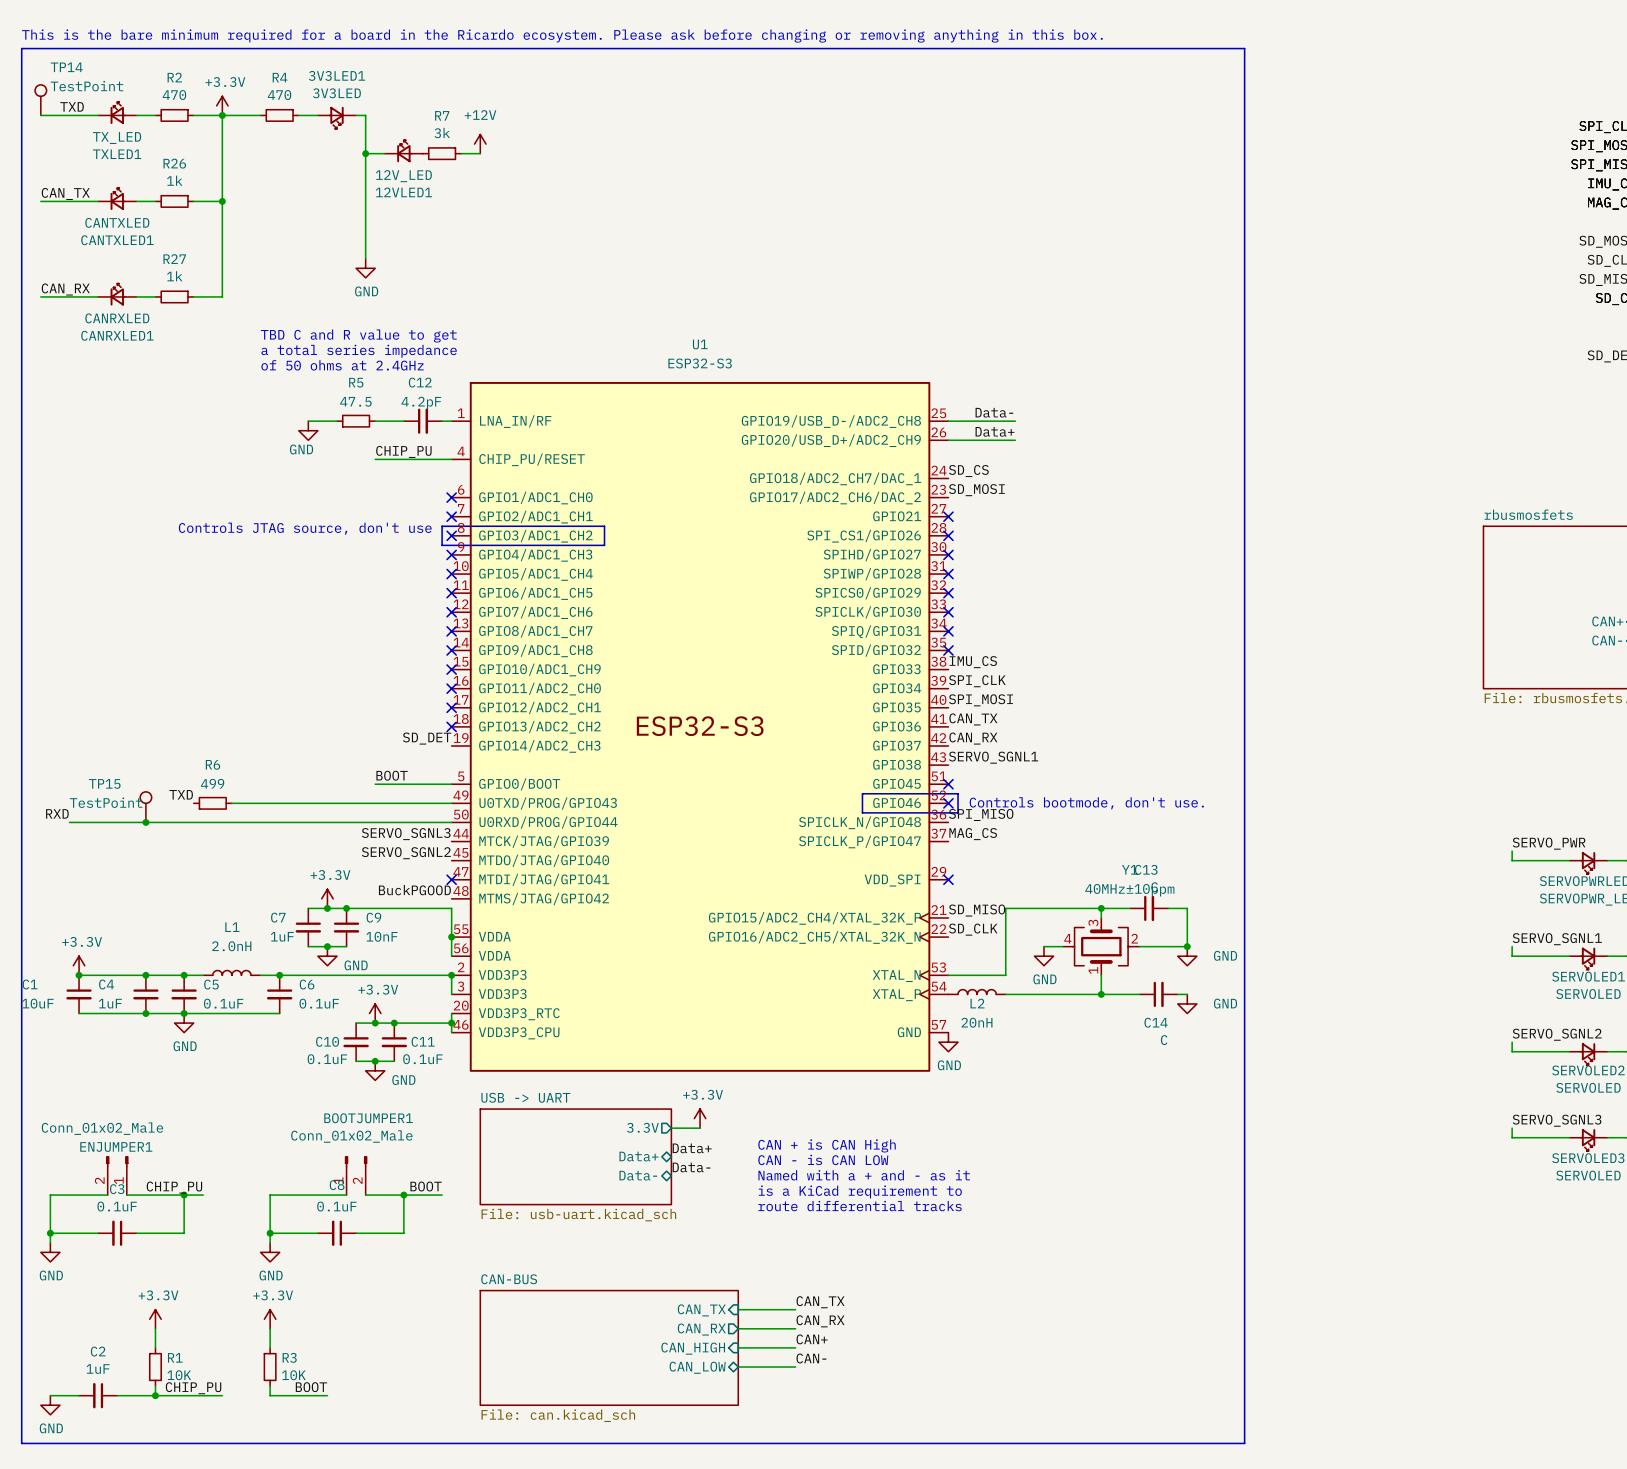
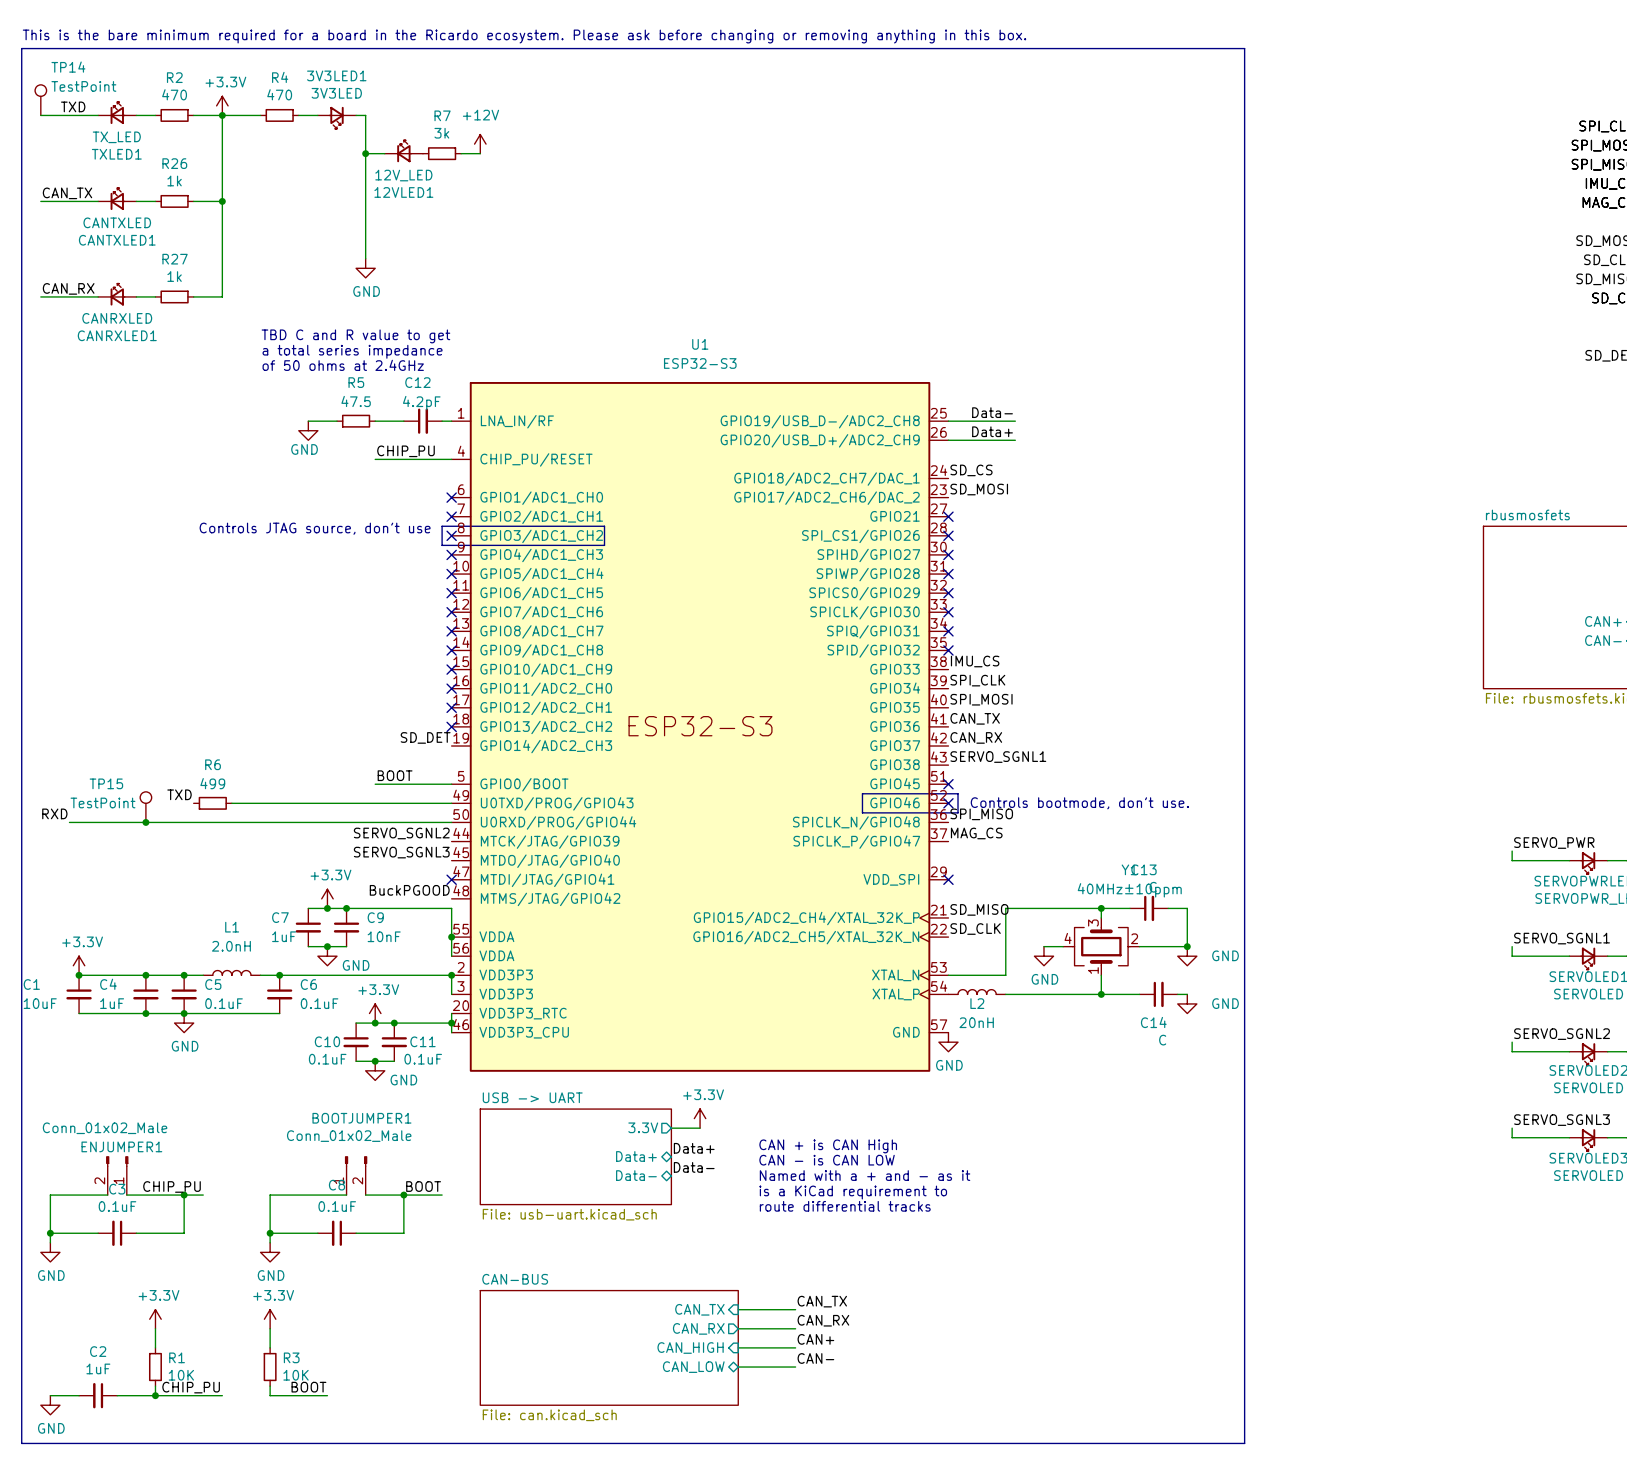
label: SERVO_SGNL3 (406, 834) -> SERVO_SGNL2 (401, 833)
label: SERVO_SGNL2 (406, 853) -> SERVO_SGNL3 (401, 852)

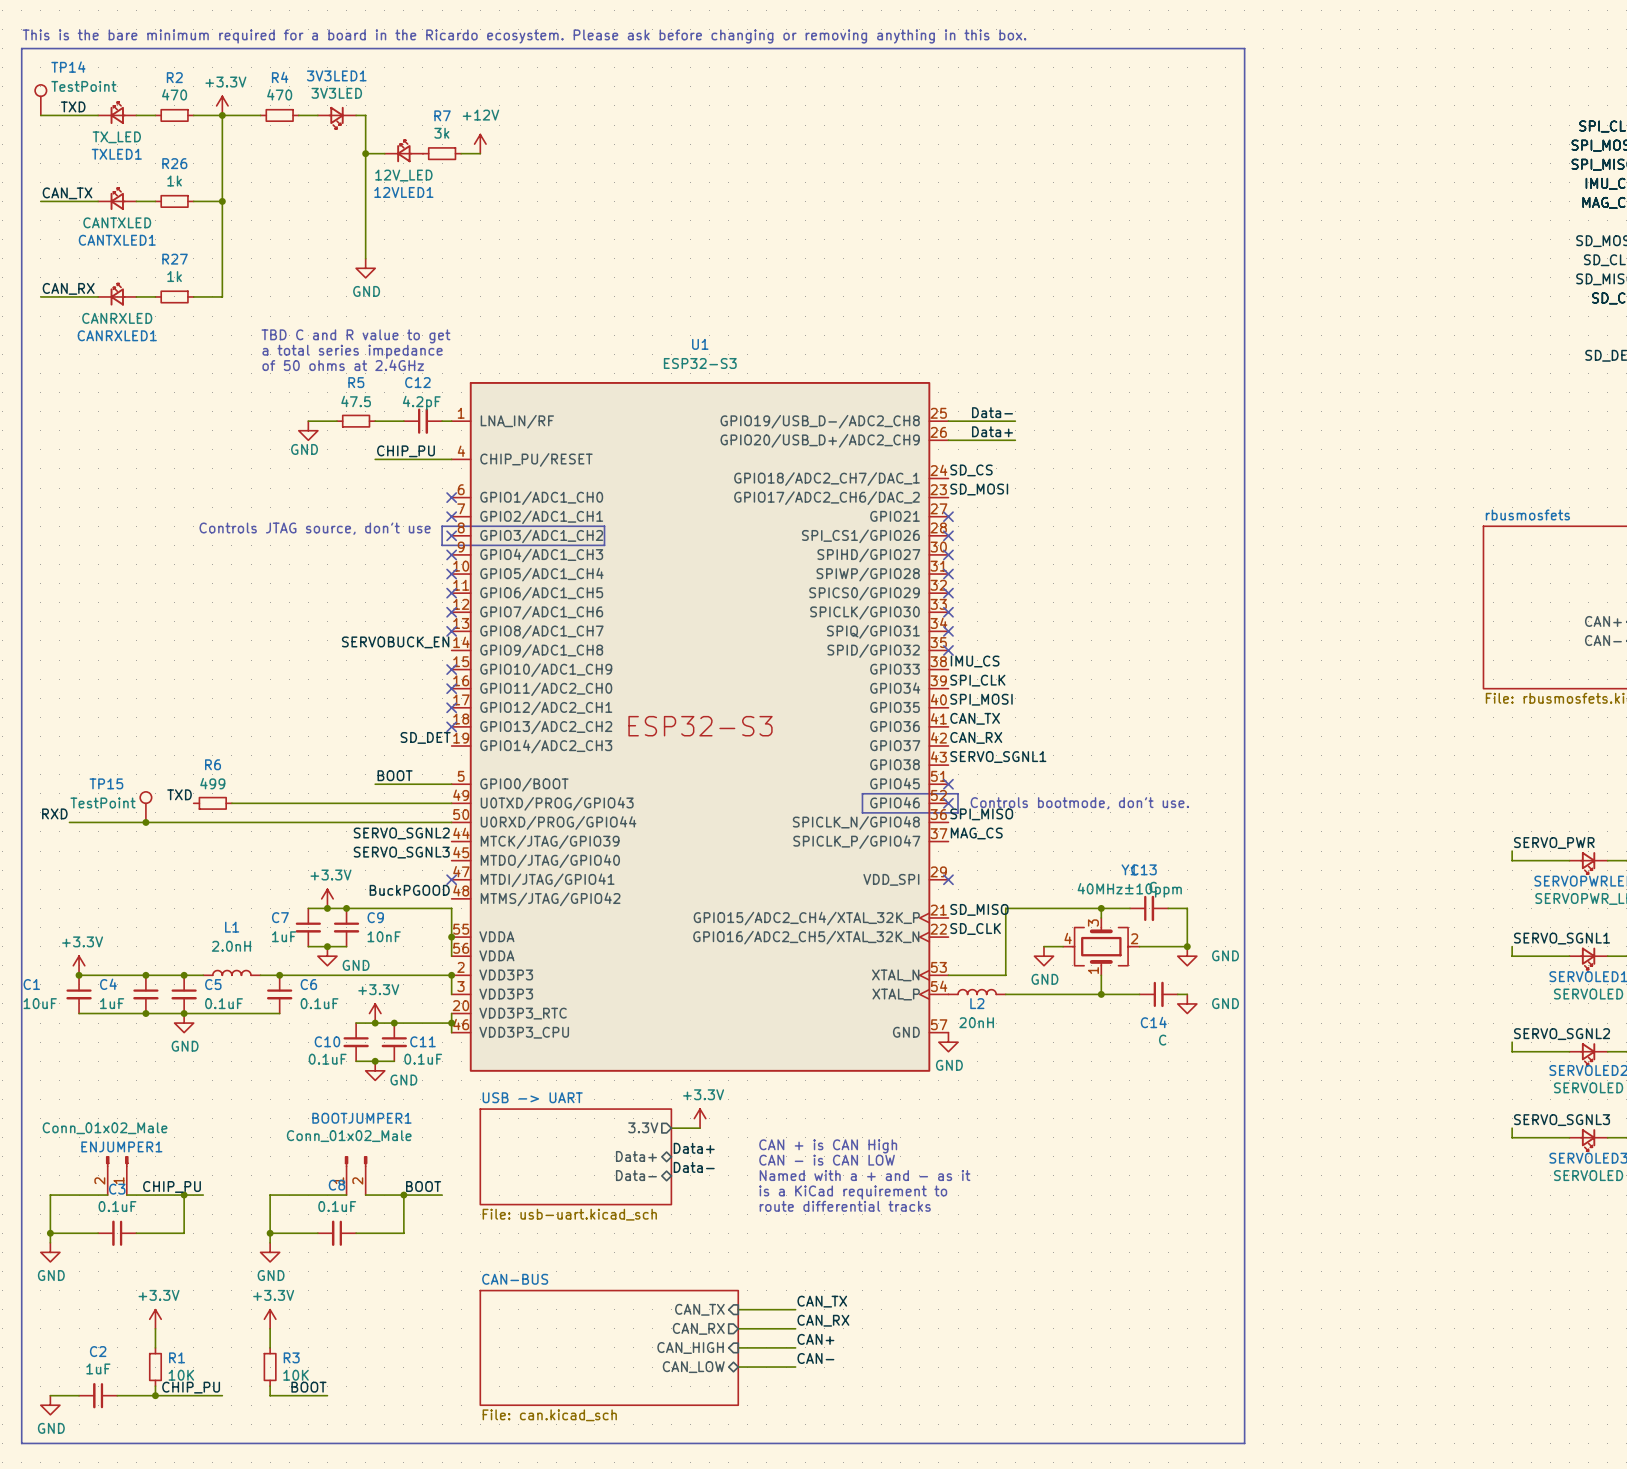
label: none -> SERVOBUCK_EN (395, 642)
no-connect mark: (451, 650) -> none

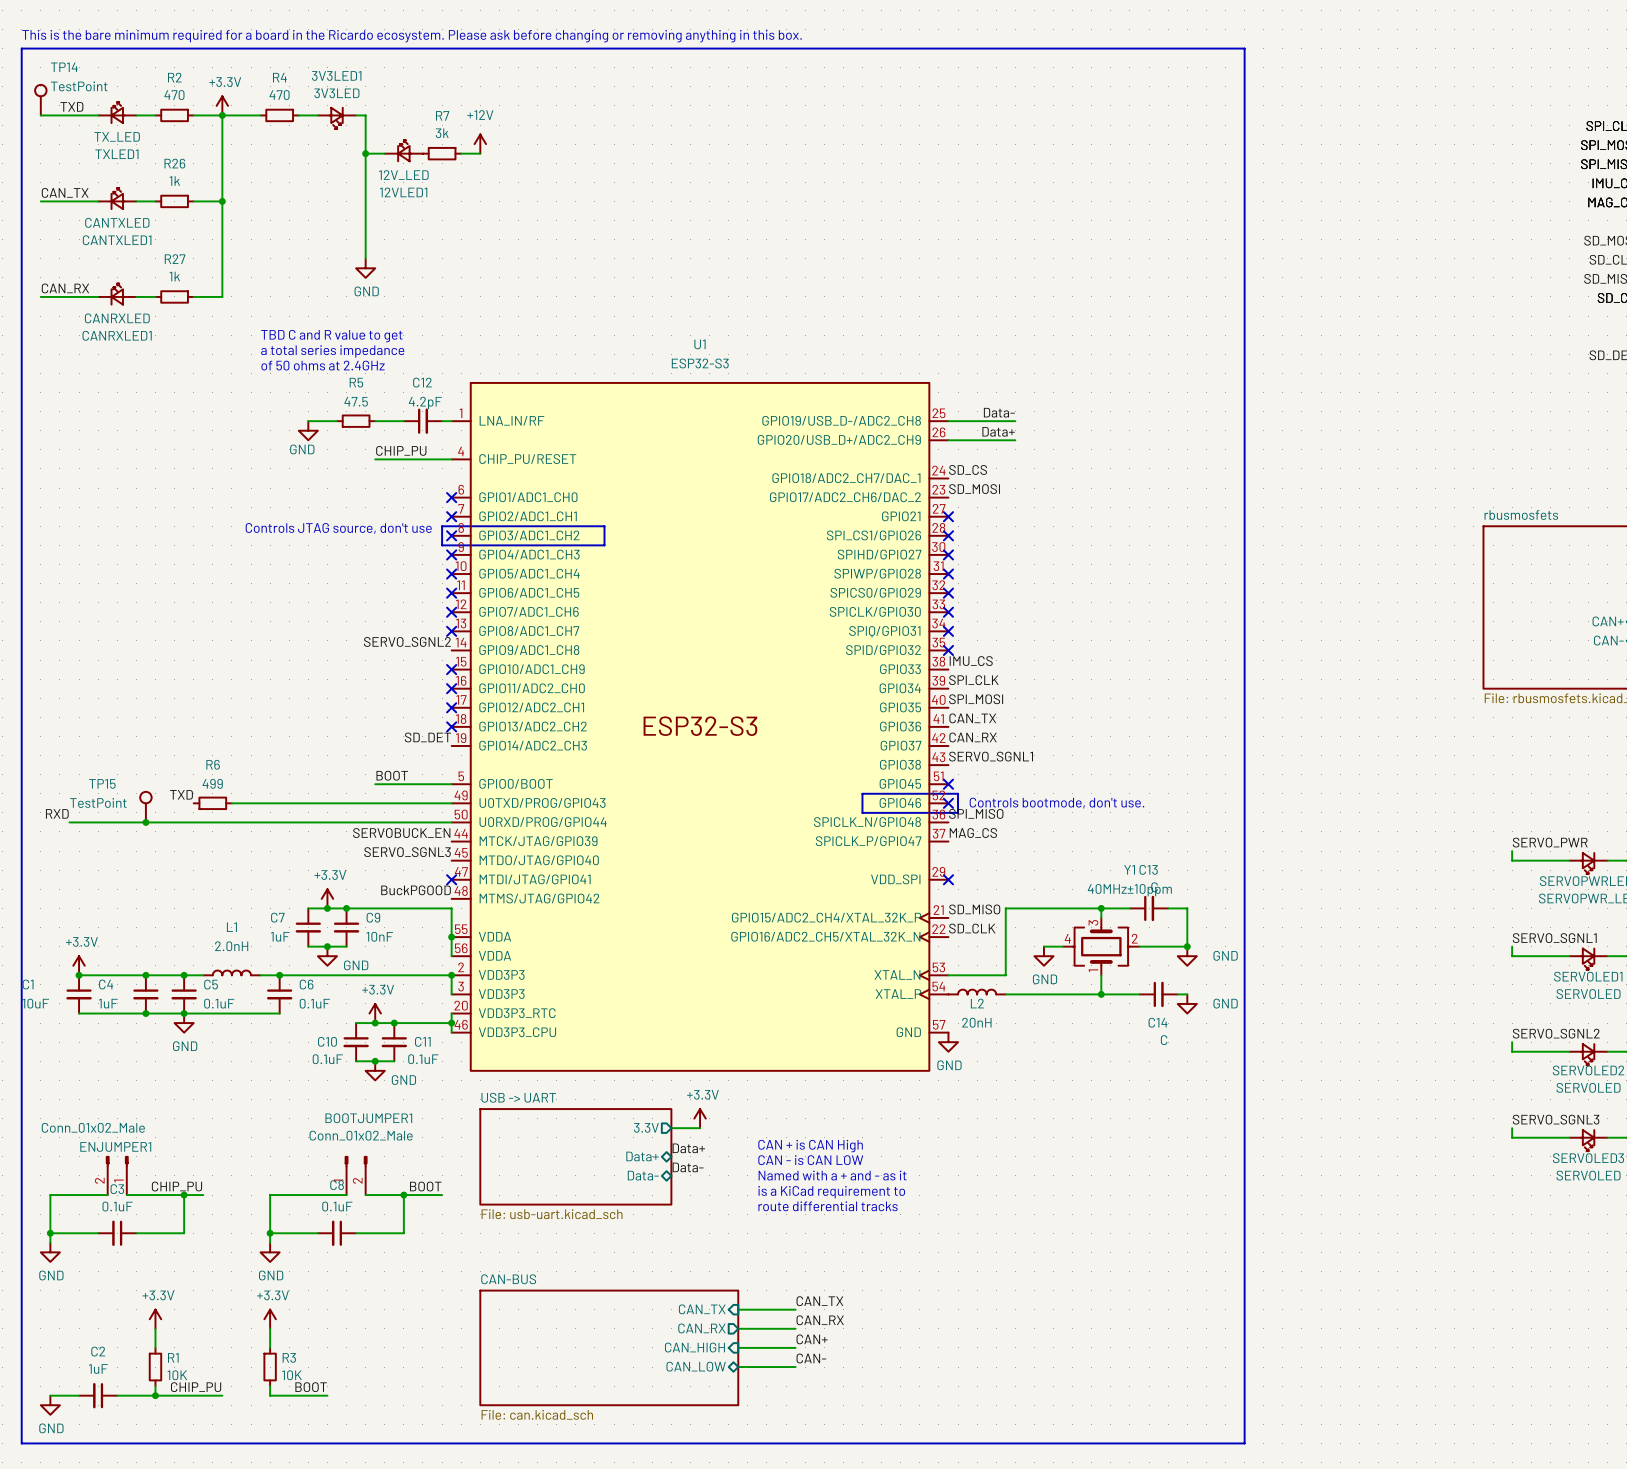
label: SERVOBUCK_EN (395, 642) -> SERVO_SGNL2 (407, 641)
label: SERVO_SGNL2 (401, 833) -> SERVOBUCK_EN (401, 833)

